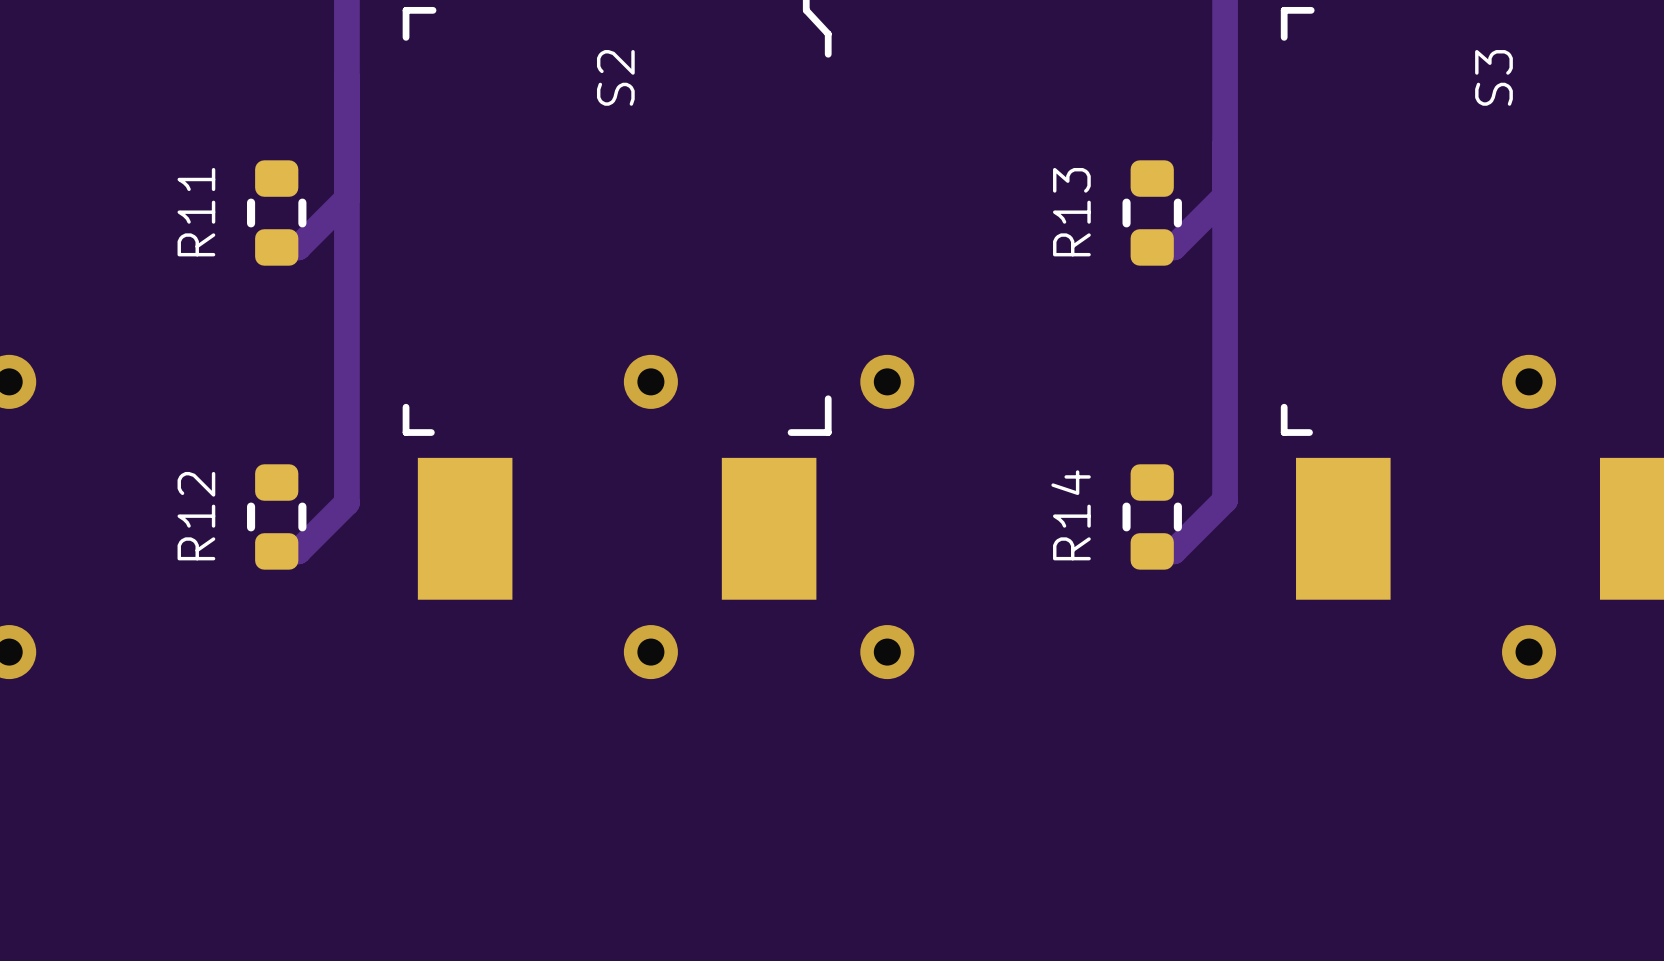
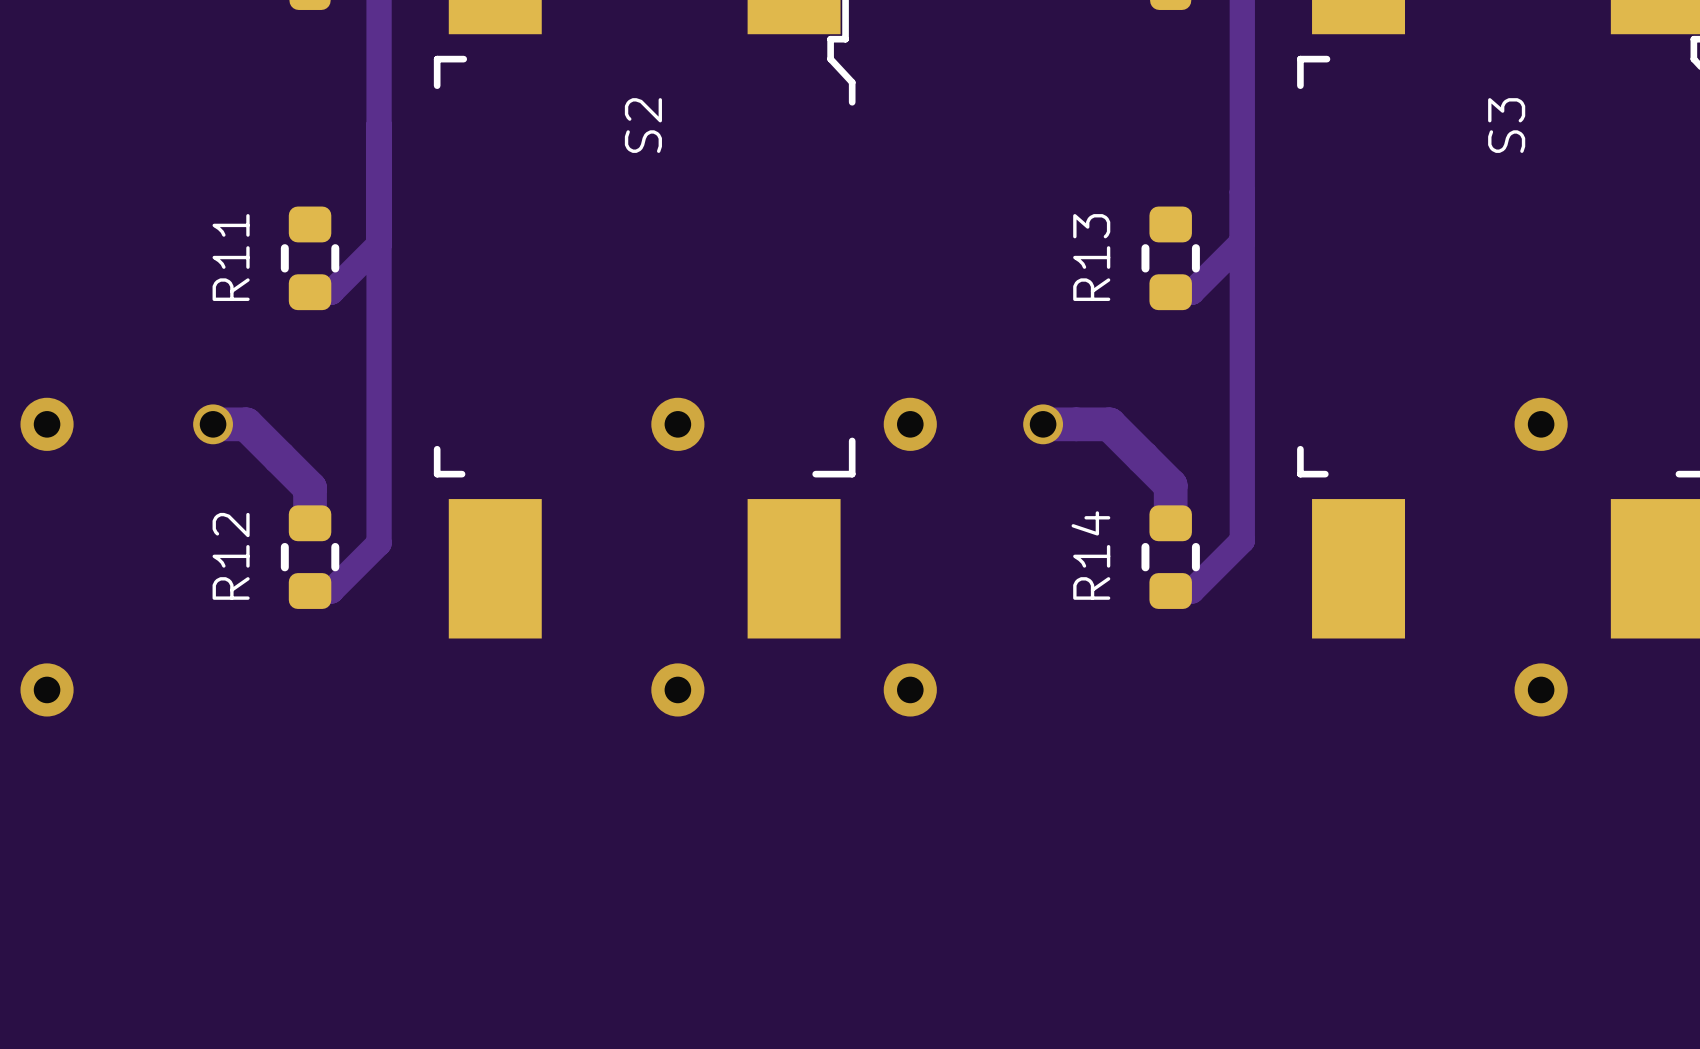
track: none -> (213, 424) (246, 424) (310, 488) (310, 523)
via: none -> (213, 424)
track: none -> (1043, 424) (1109, 424) (1170, 485) (1170, 523)
via: none -> (1043, 424)

